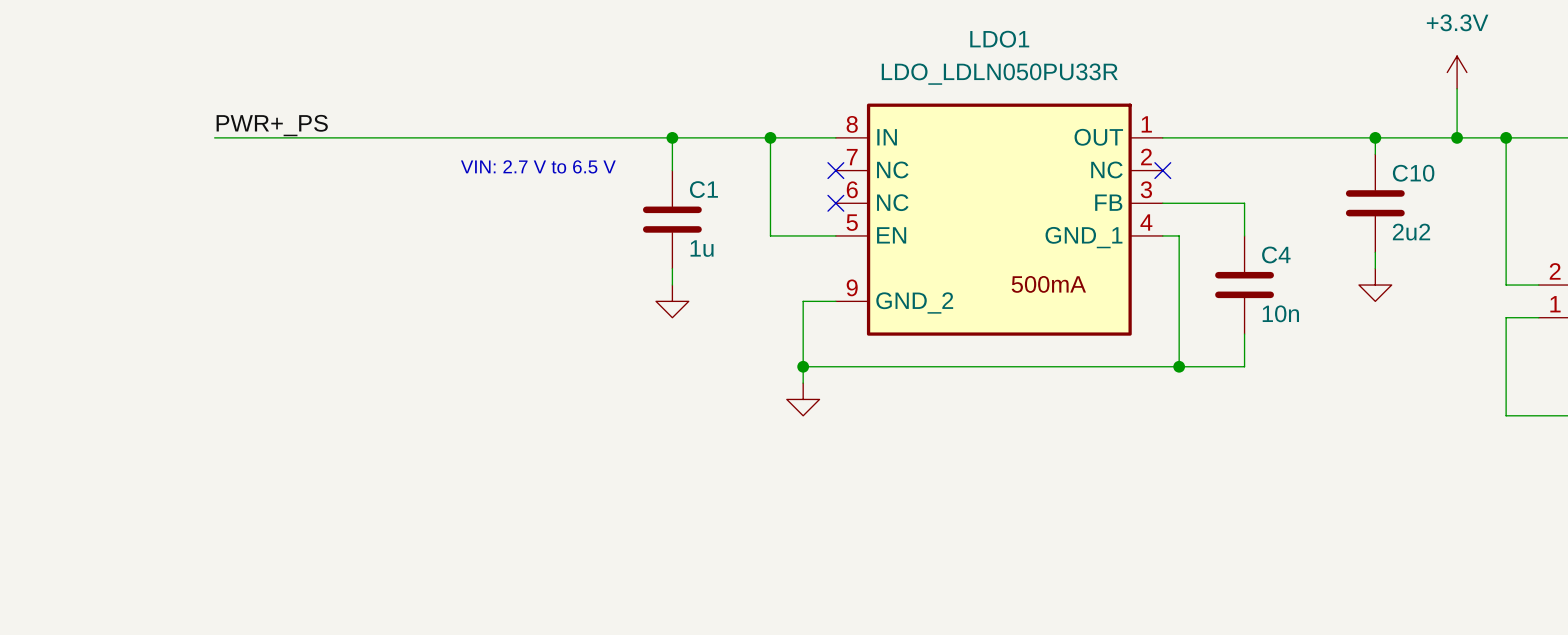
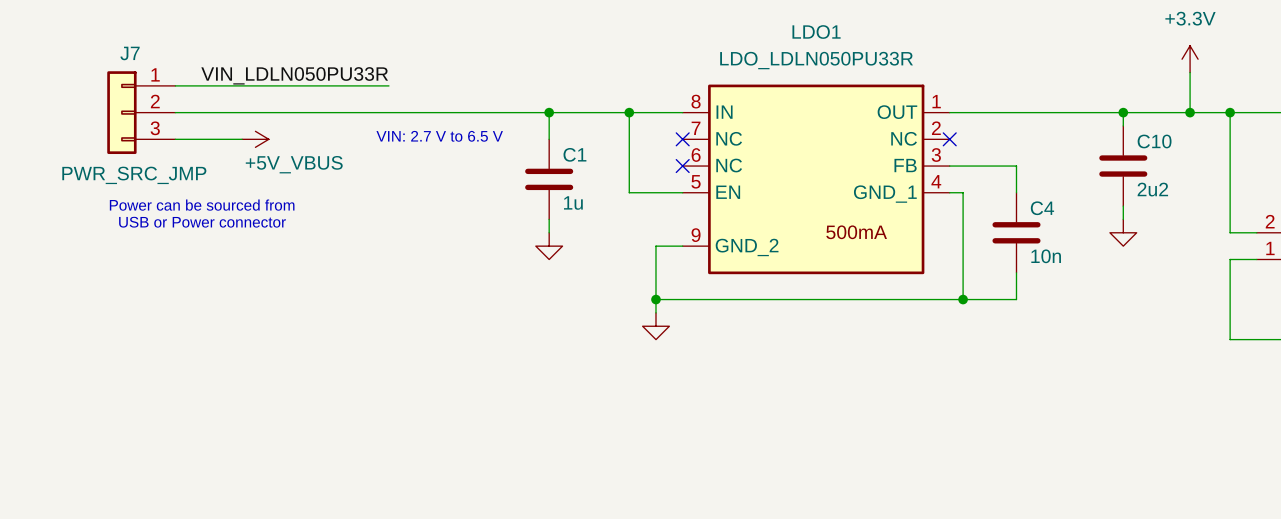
label: none -> VIN_LDLN050PU33R (294, 75)
wire: none -> (175, 85) (388, 85)
label: PWR+_PS (272, 125) -> none
J7: none -> PWR_SRC_JMP (141, 112)
wire: none -> (175, 139) (242, 139)
power symbol: none -> +5V_VBUS (255, 139)
text: none -> Power can be sourced from (202, 205)
text: none -> USB or Power connector (202, 222)

